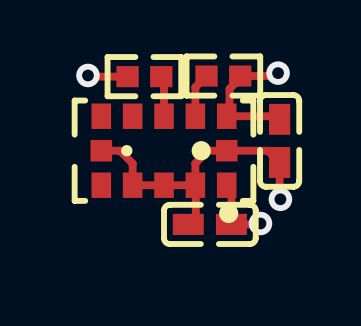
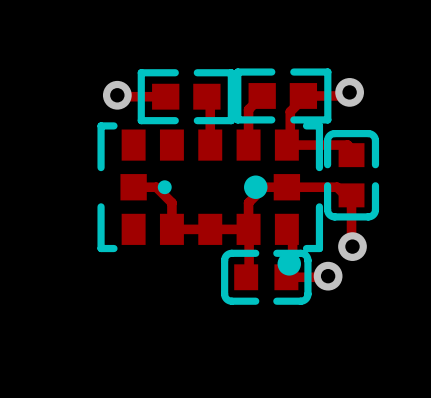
part footprint: [257, 92, 303, 190] -> [323, 129, 380, 221]
part footprint: [161, 201, 259, 247] -> [221, 249, 312, 305]

